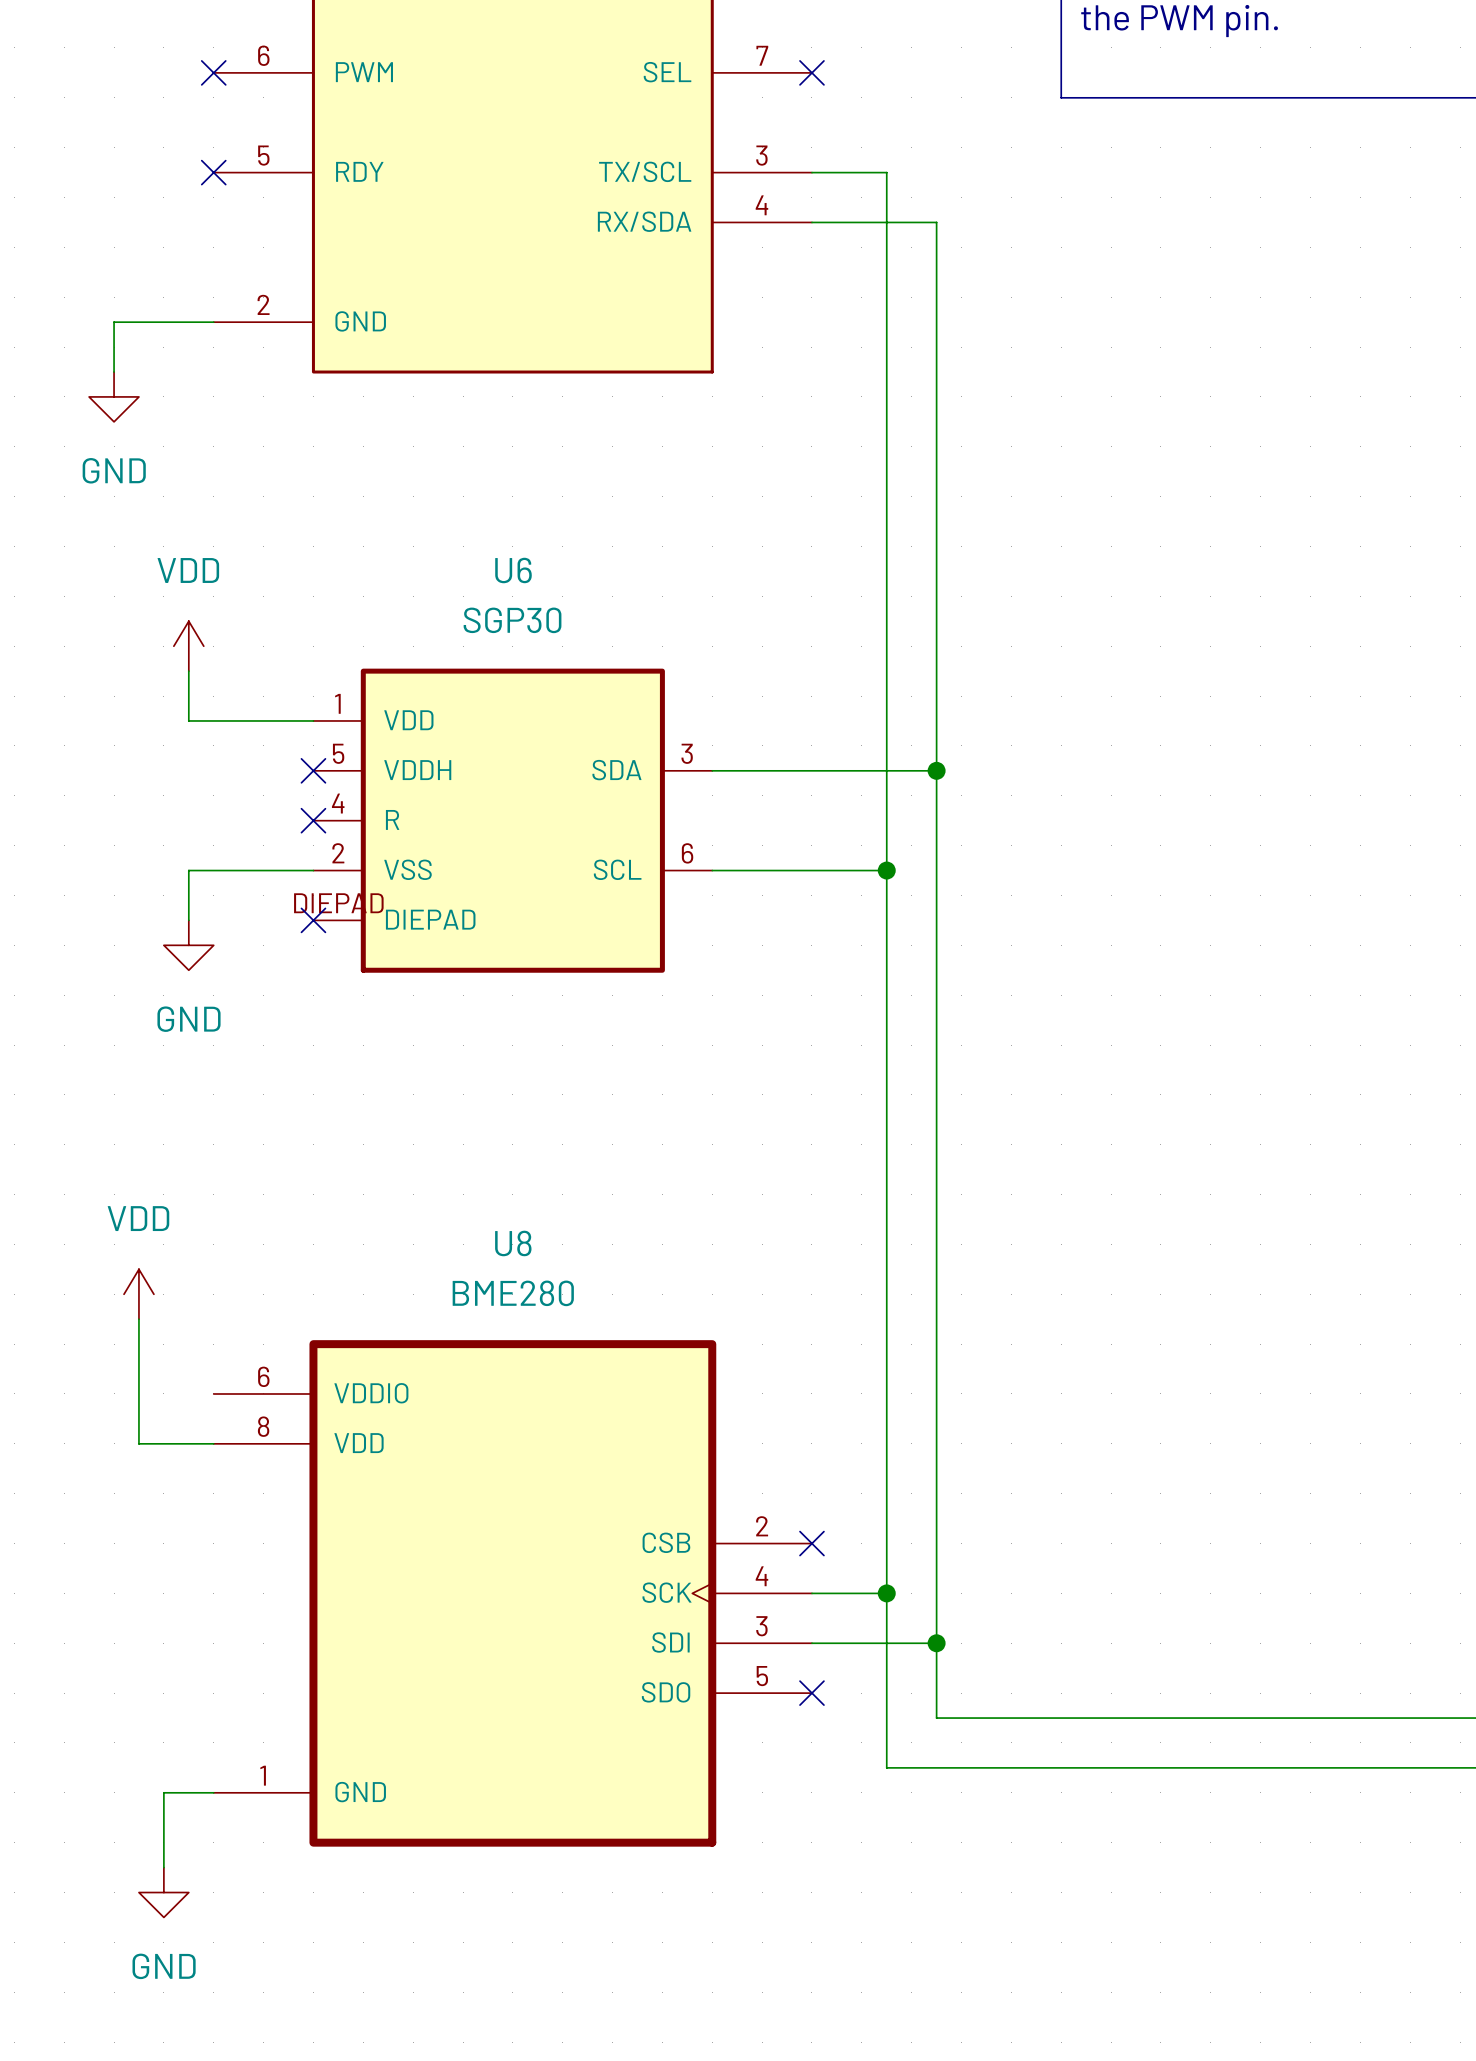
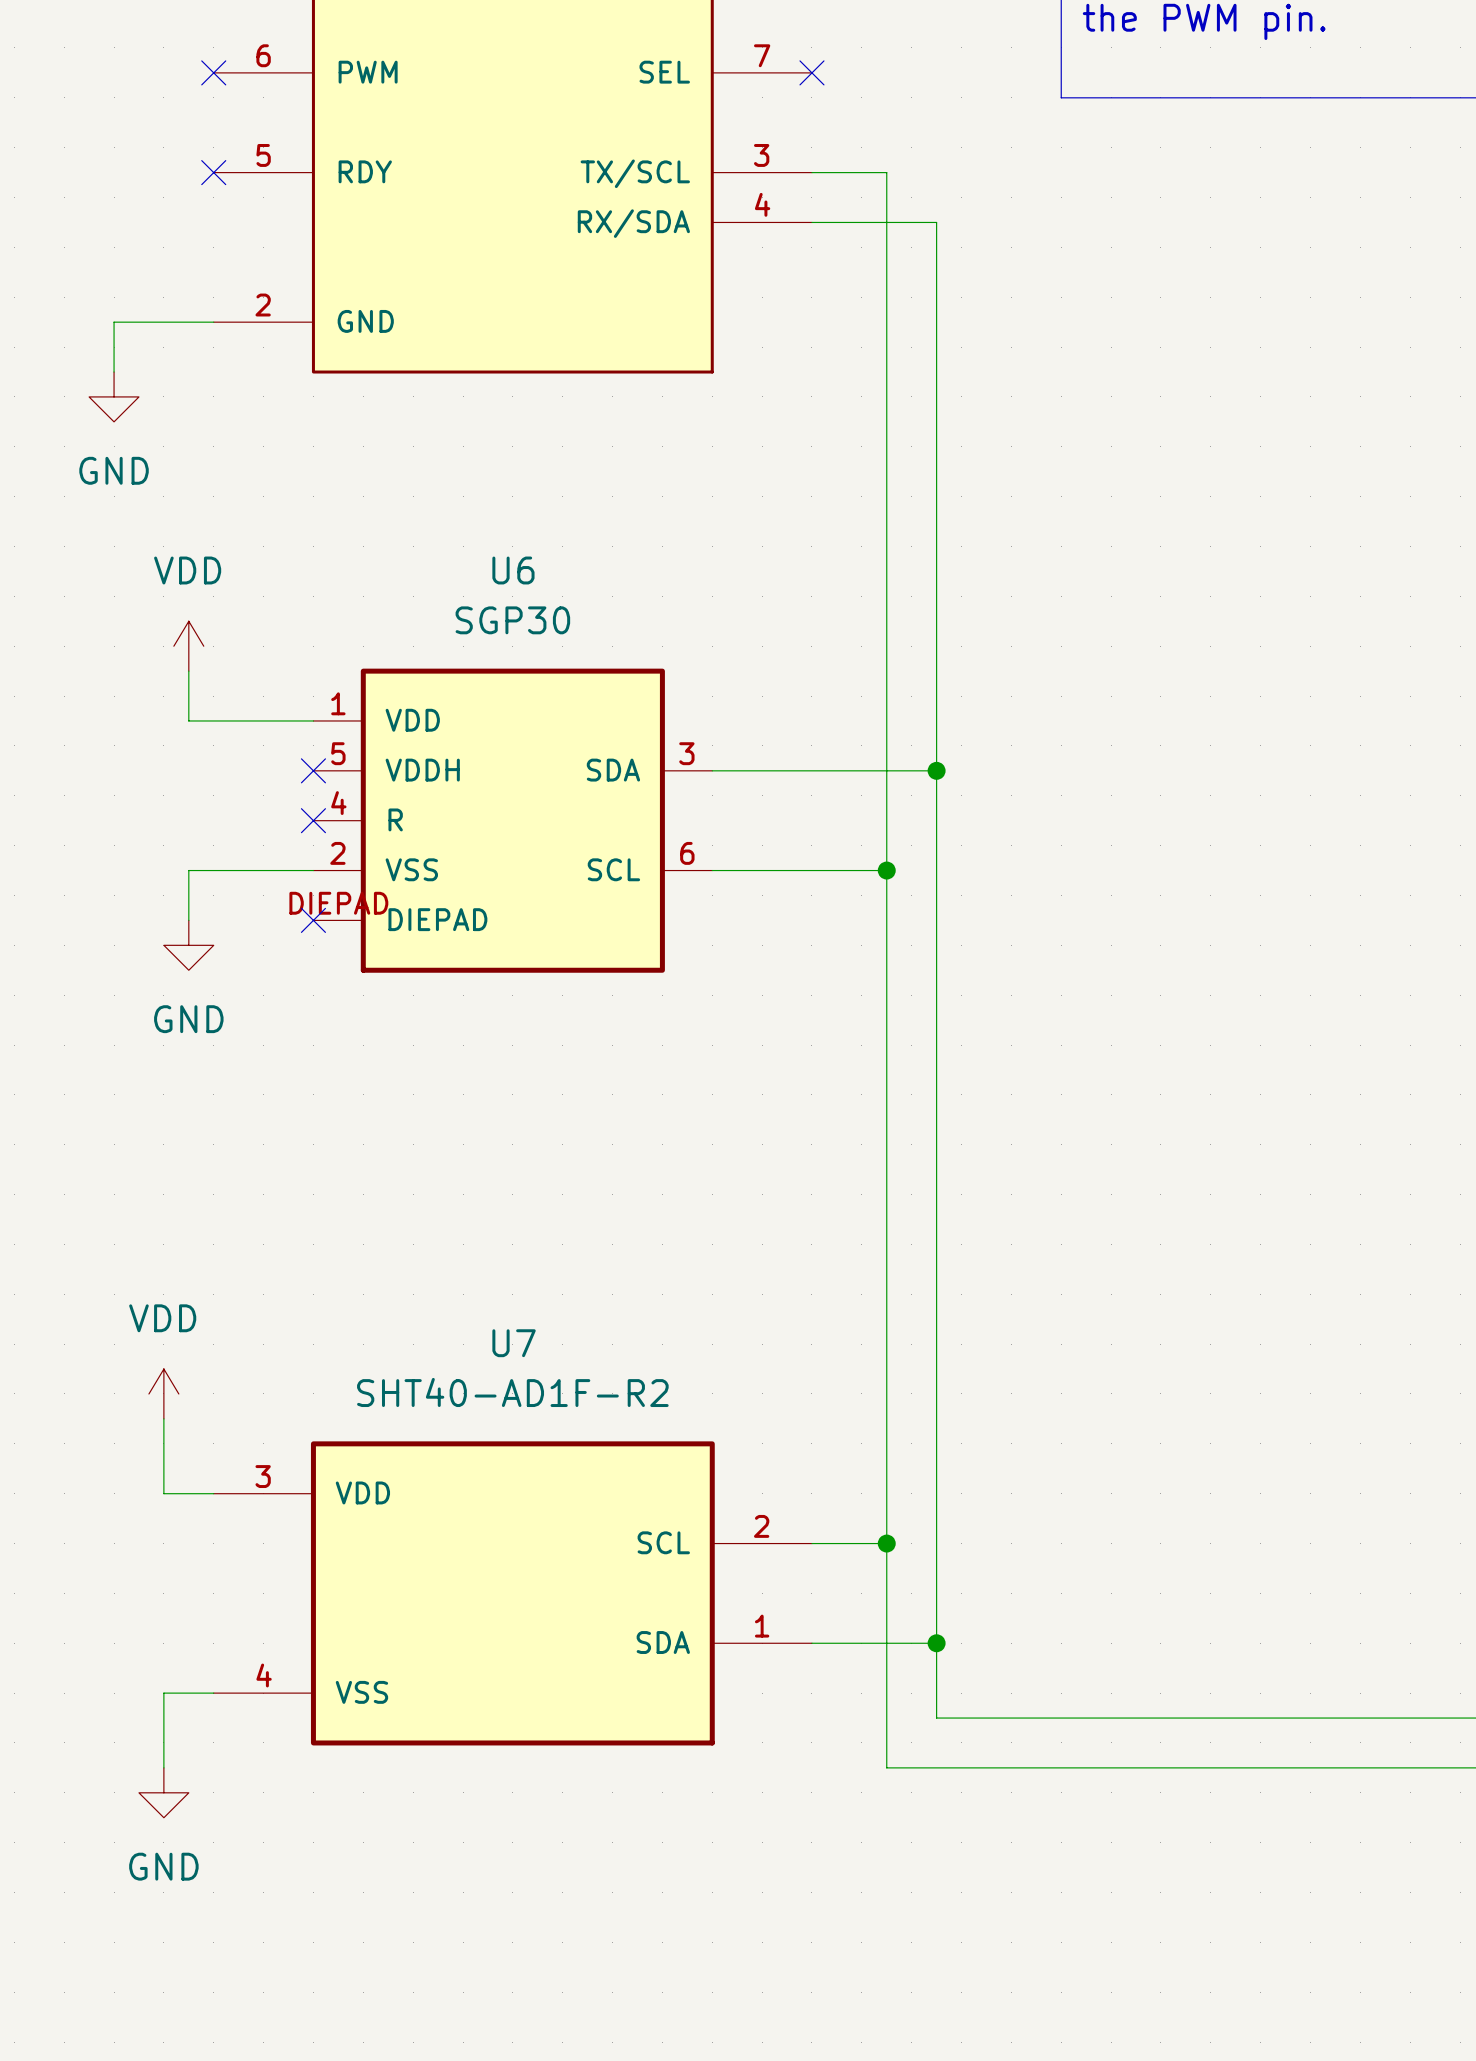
power symbol position: VDD (138, 1294) -> VDD (163, 1393)
wire: (138, 1319) (138, 1443) (213, 1443) -> none
wire: none -> (163, 1418) (163, 1493) (213, 1493)
no-connect mark: (811, 1543) -> none
U8: BME280 (512, 1593) -> none
U7: none -> SHT40-AD1F-R2 (512, 1593)
wire: (811, 1593) (886, 1593) -> (811, 1543) (886, 1543)
junction position: (886, 1593) -> (886, 1543)
no-connect mark: (811, 1693) -> none
wire: (213, 1792) (163, 1792) (163, 1867) -> (213, 1693) (163, 1693) (163, 1767)
power symbol position: GND (163, 1892) -> GND (163, 1792)

